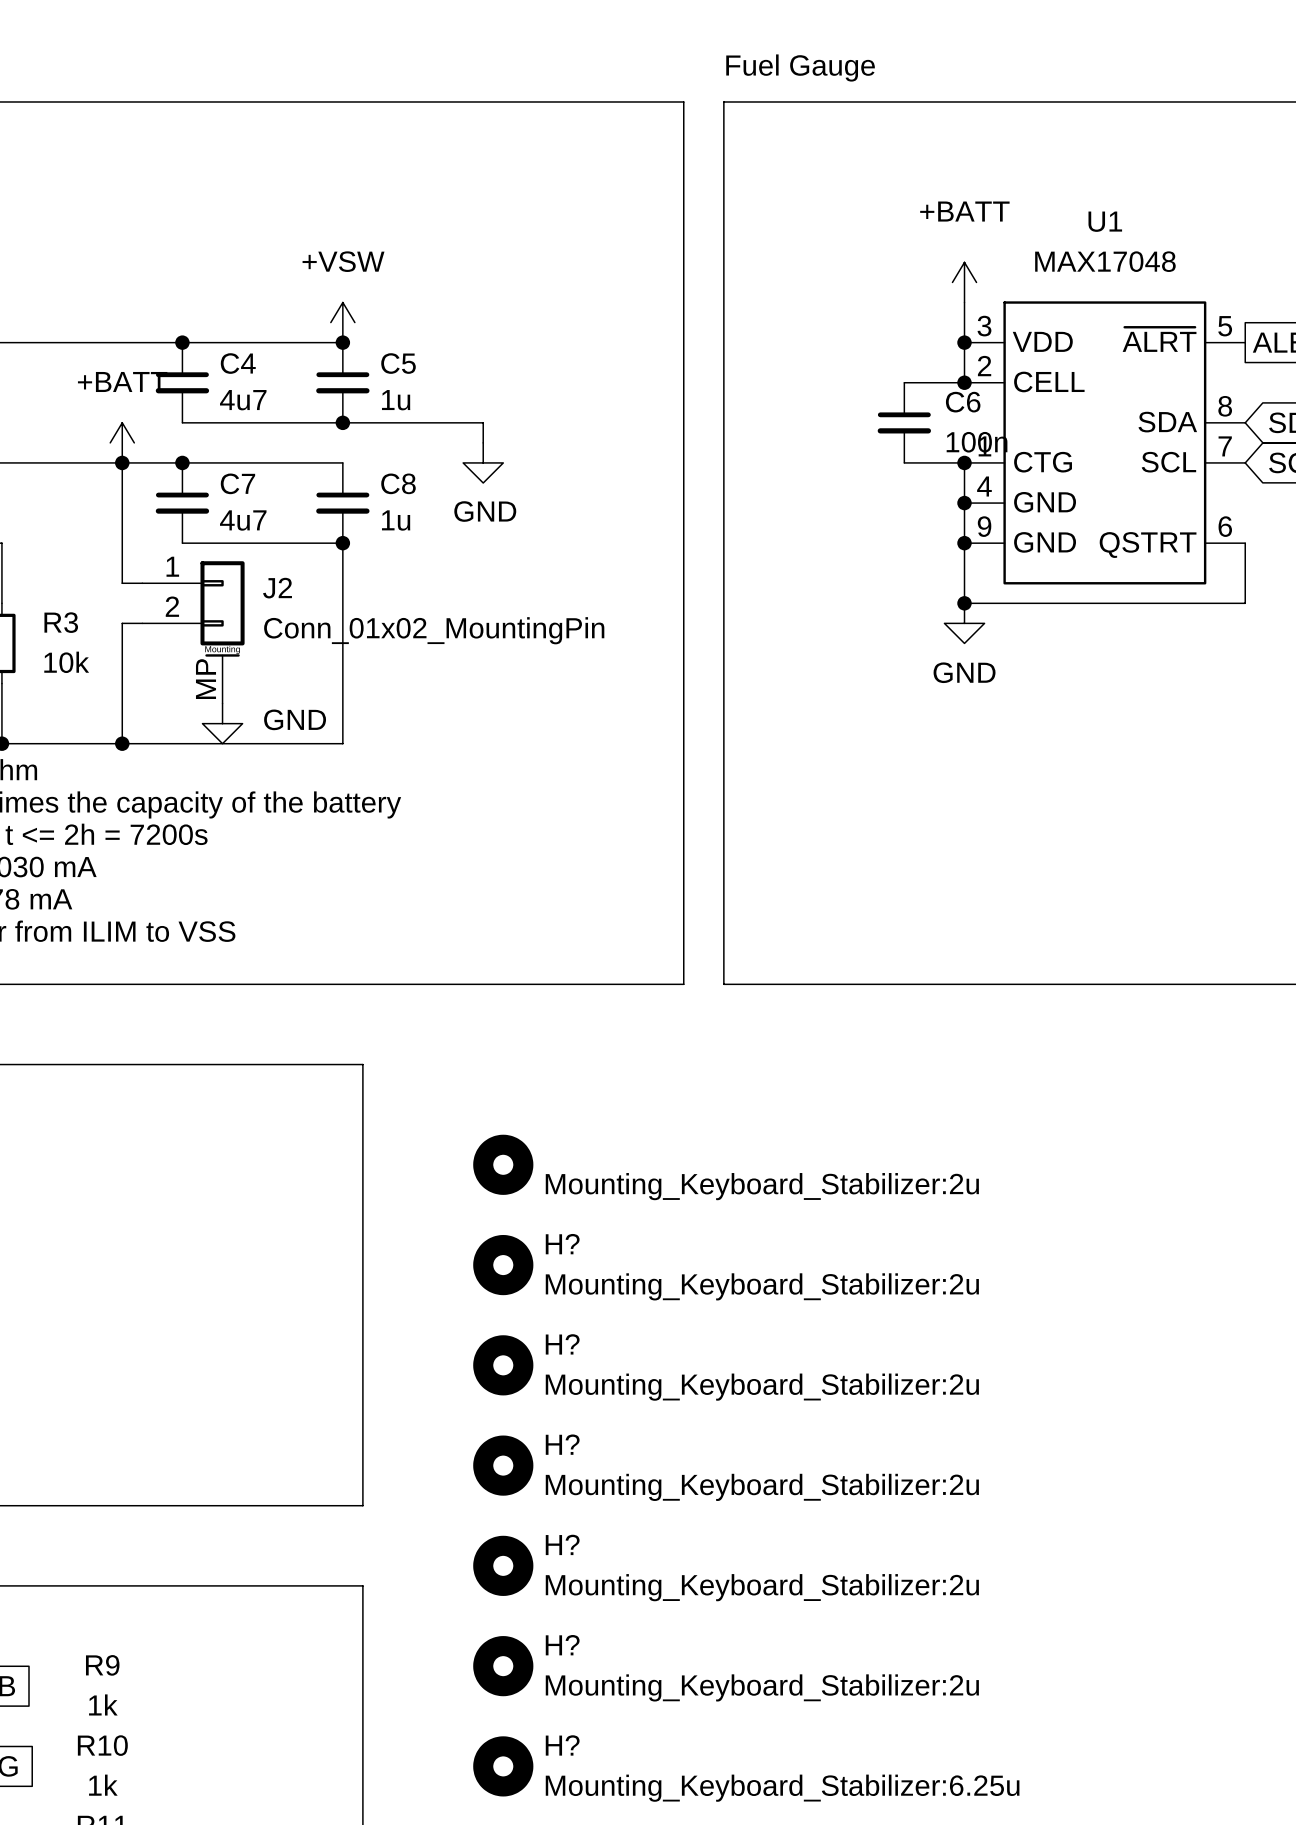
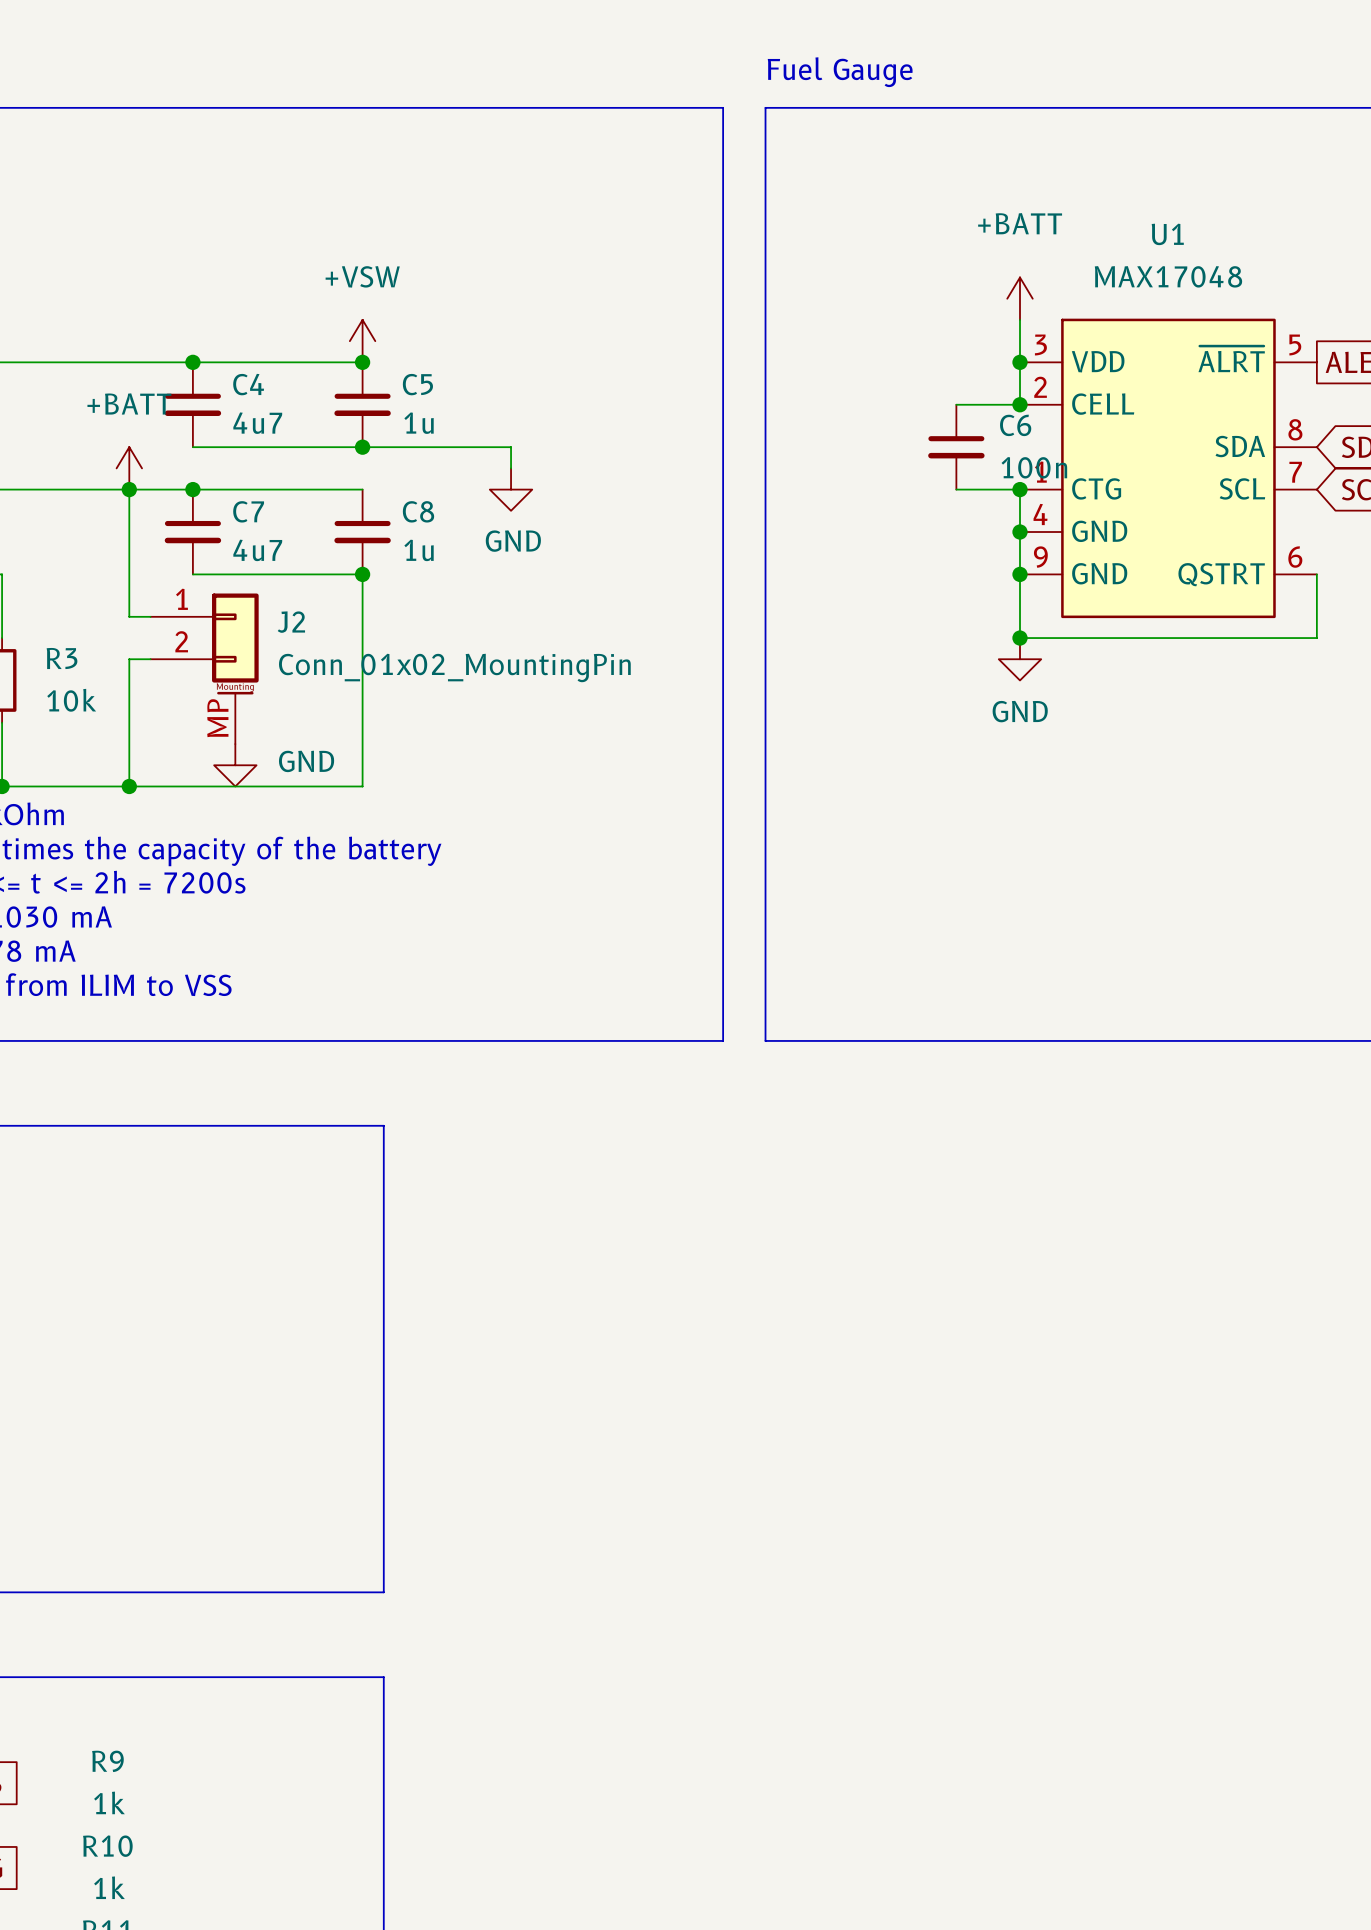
part: Mounting_Keyboard_Stabilizer:2u (503, 1164) -> none
H?: Mounting_Keyboard_Stabilizer:2u (503, 1265) -> none
H?: Mounting_Keyboard_Stabilizer:2u (503, 1365) -> none
H?: Mounting_Keyboard_Stabilizer:2u (503, 1465) -> none
H?: Mounting_Keyboard_Stabilizer:2u (503, 1565) -> none
H?: Mounting_Keyboard_Stabilizer:2u (503, 1666) -> none
H?: Mounting_Keyboard_Stabilizer:6.25u (503, 1766) -> none

